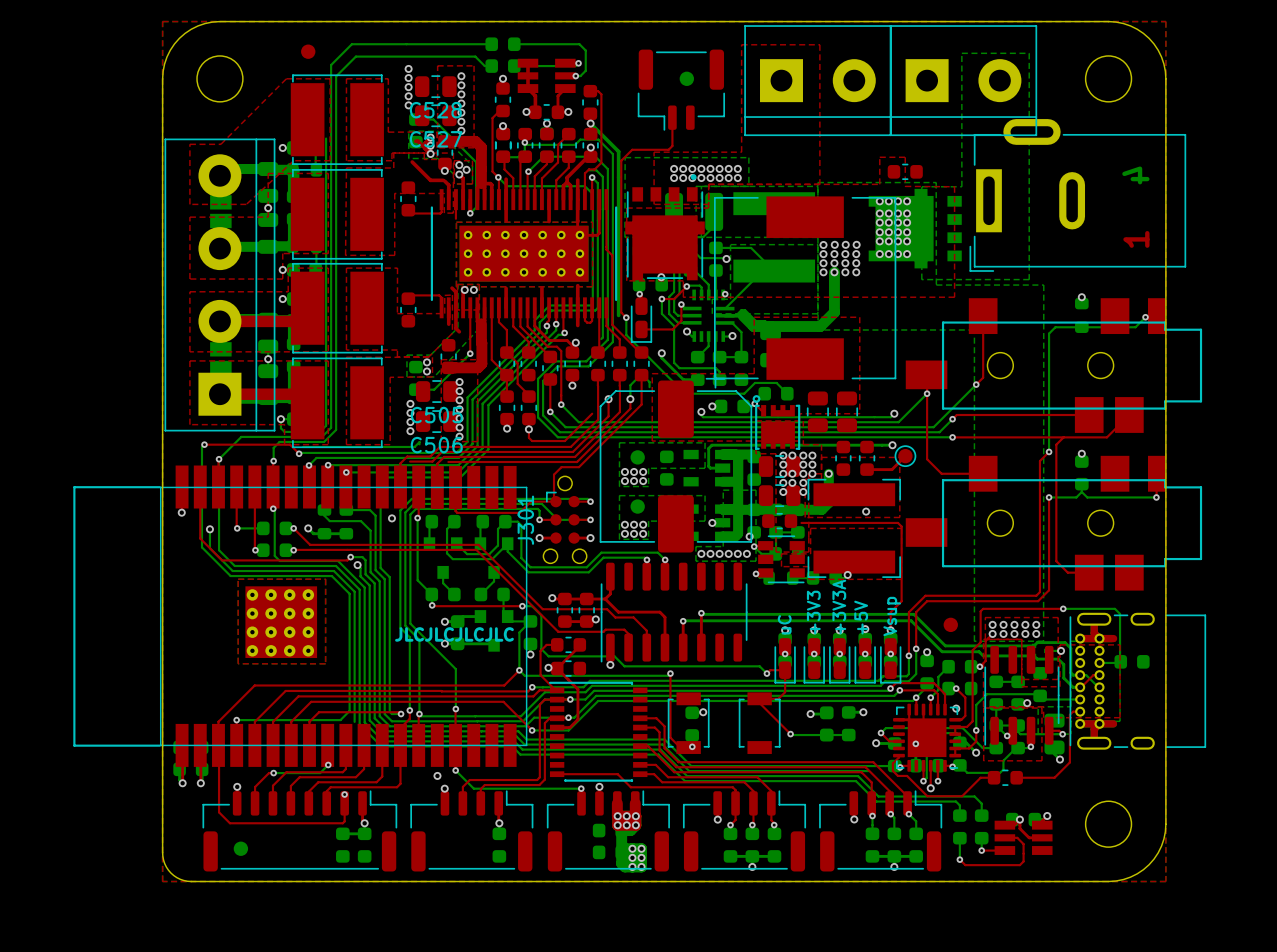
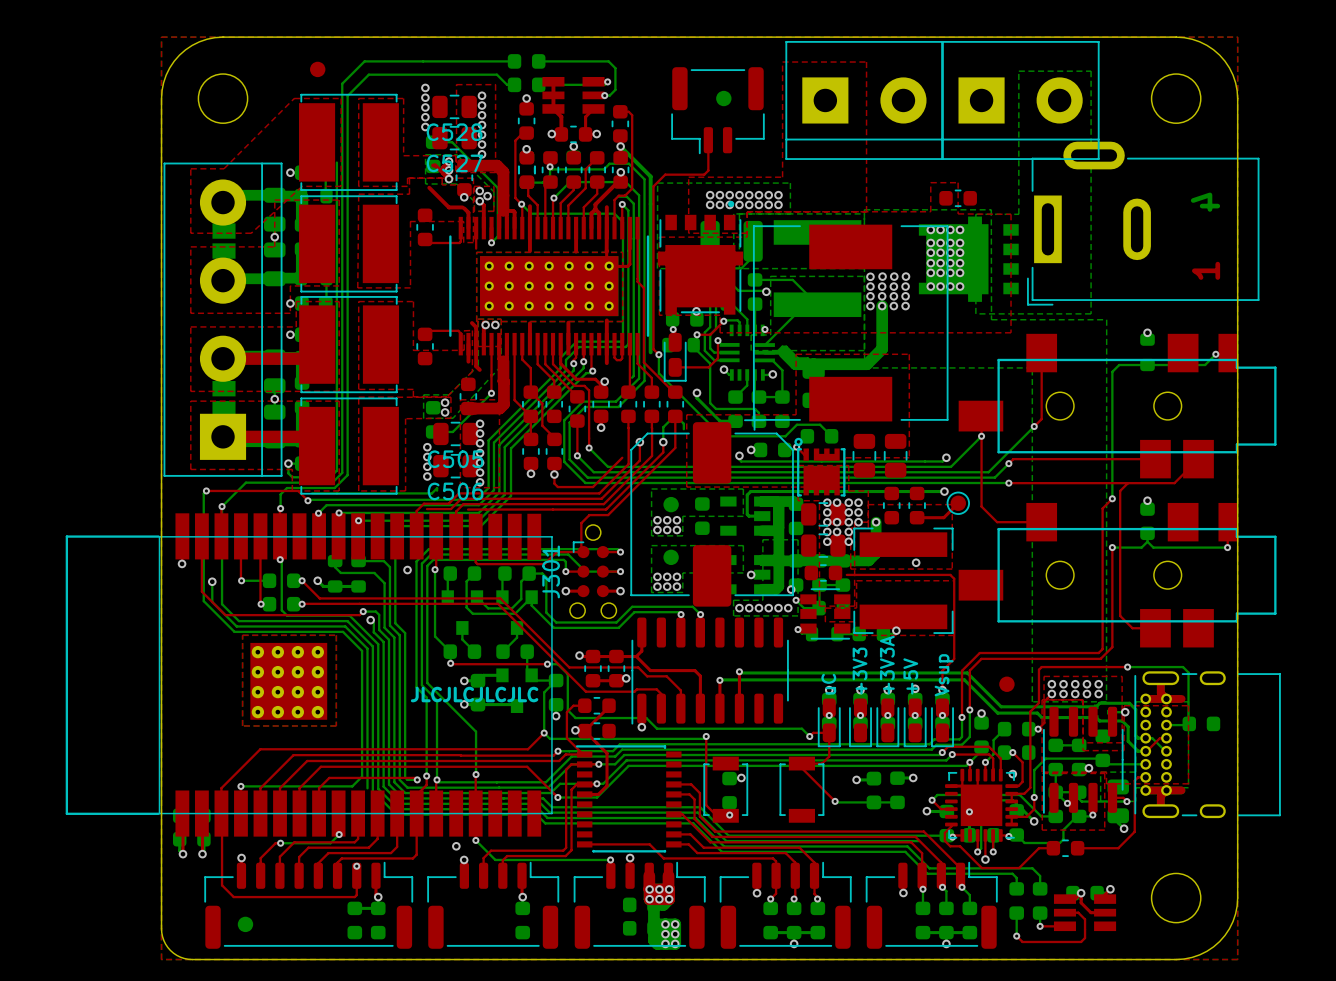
part: none -> (681, 345)

